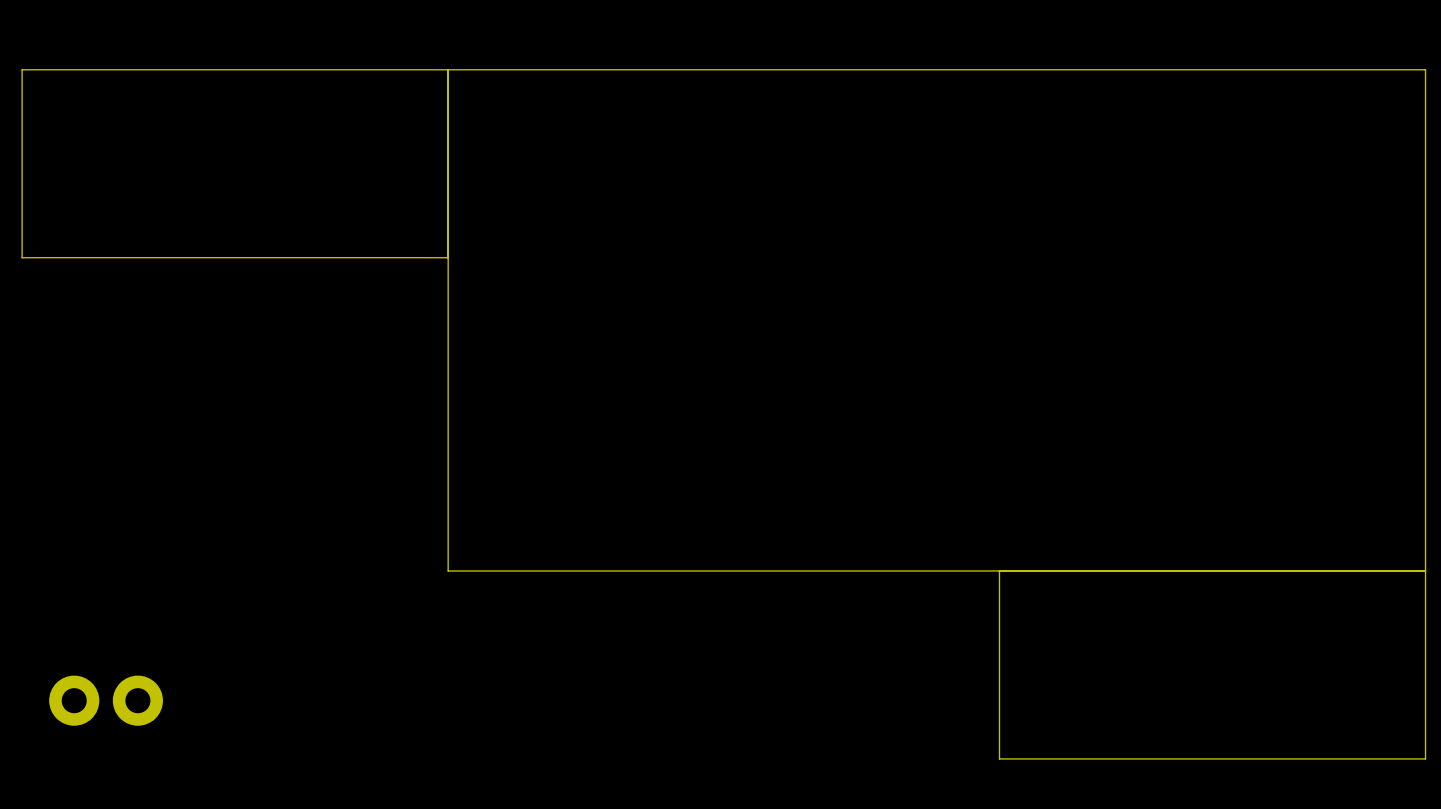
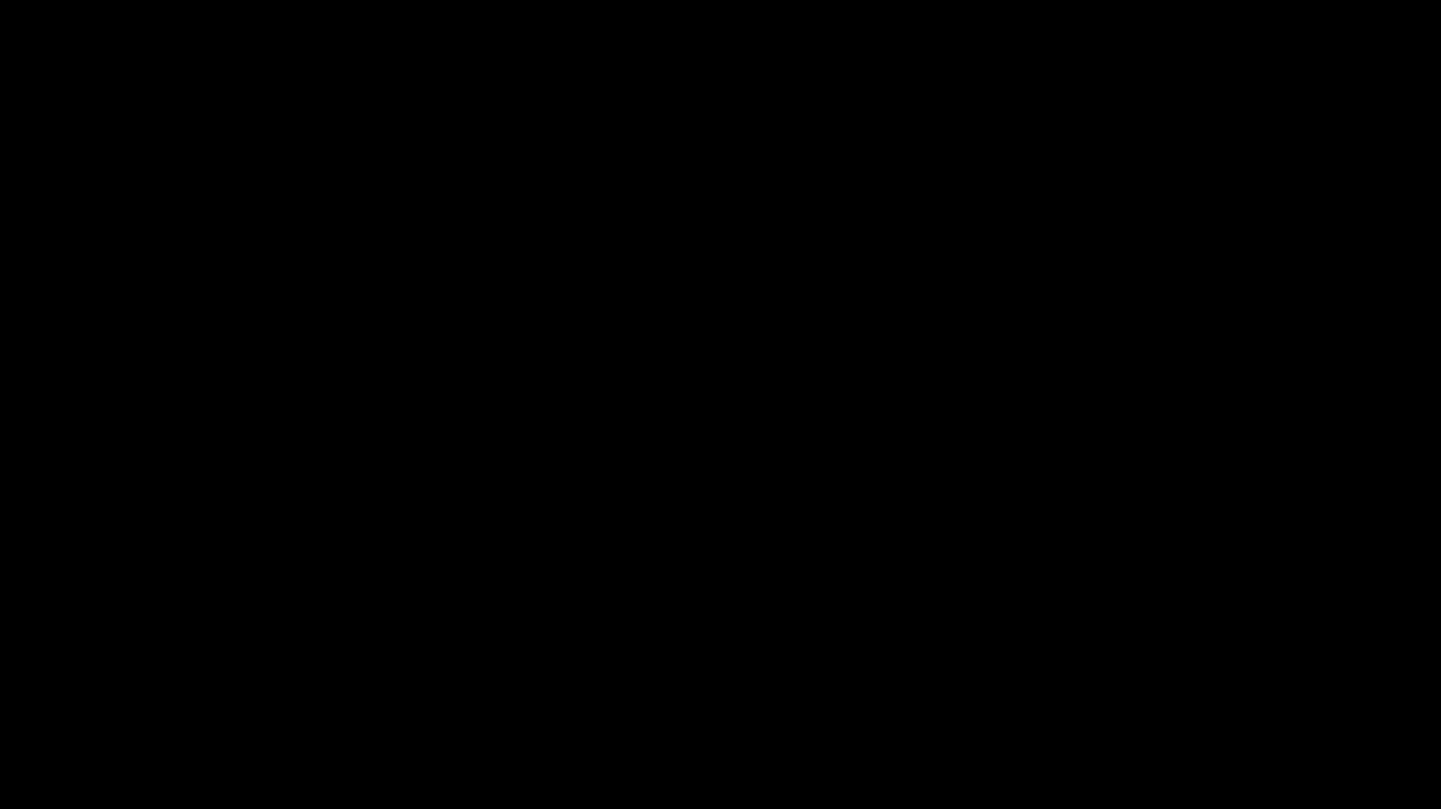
board edge: (448, 69) (448, 570) (1425, 570) -> none
board edge: (448, 257) (22, 257) (22, 69) (1425, 69) (1425, 758) (999, 758) (999, 570) -> none
part: (106, 700) -> none

